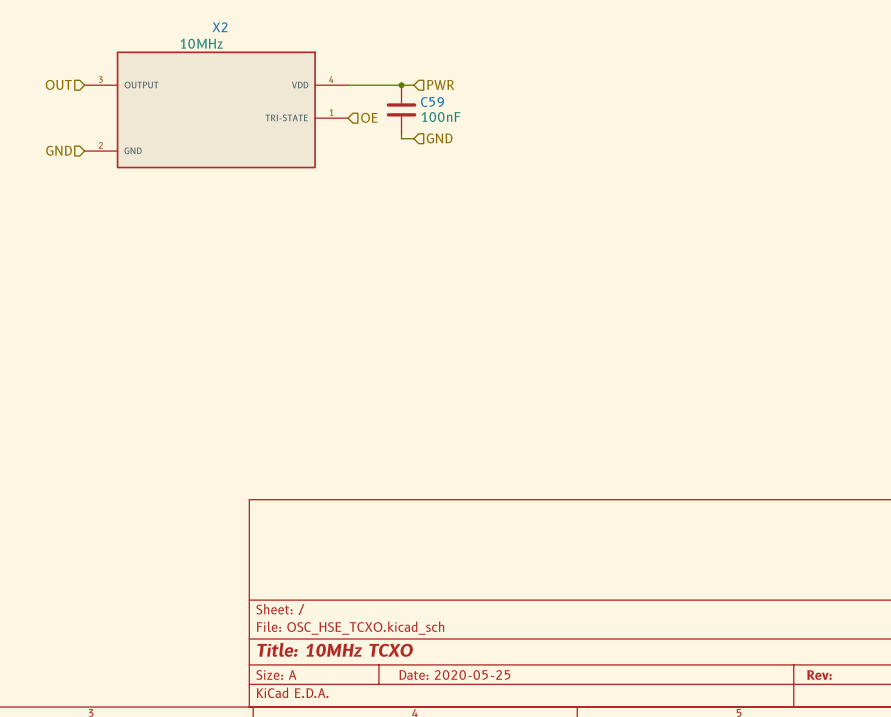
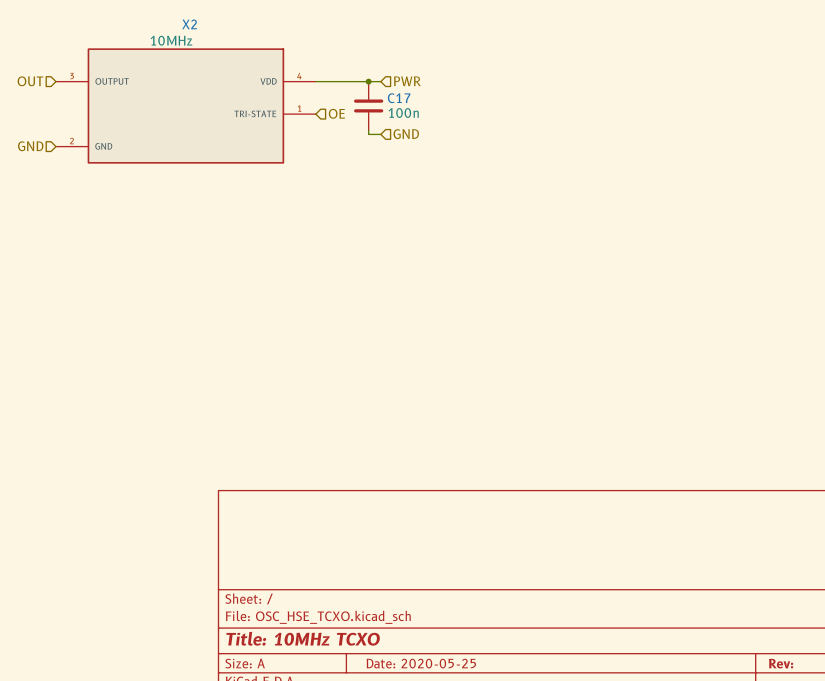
C59 name: C59 (432, 102) -> C17 (399, 98)
C59 value: 100nF (441, 117) -> 100n (403, 112)

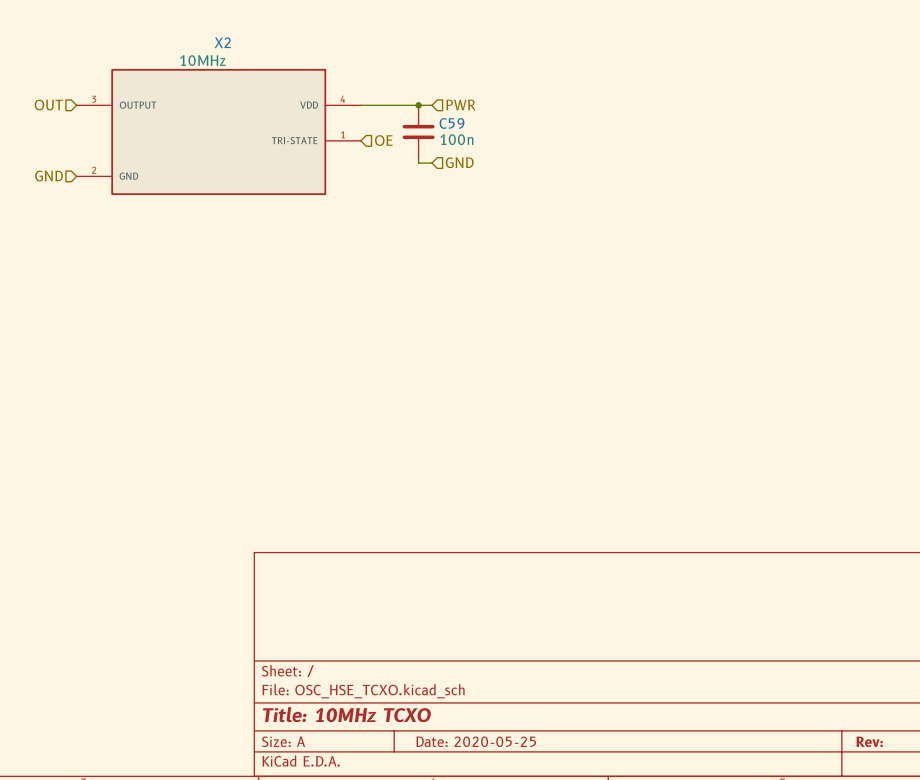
C17 name: C17 (399, 98) -> C59 (452, 123)

